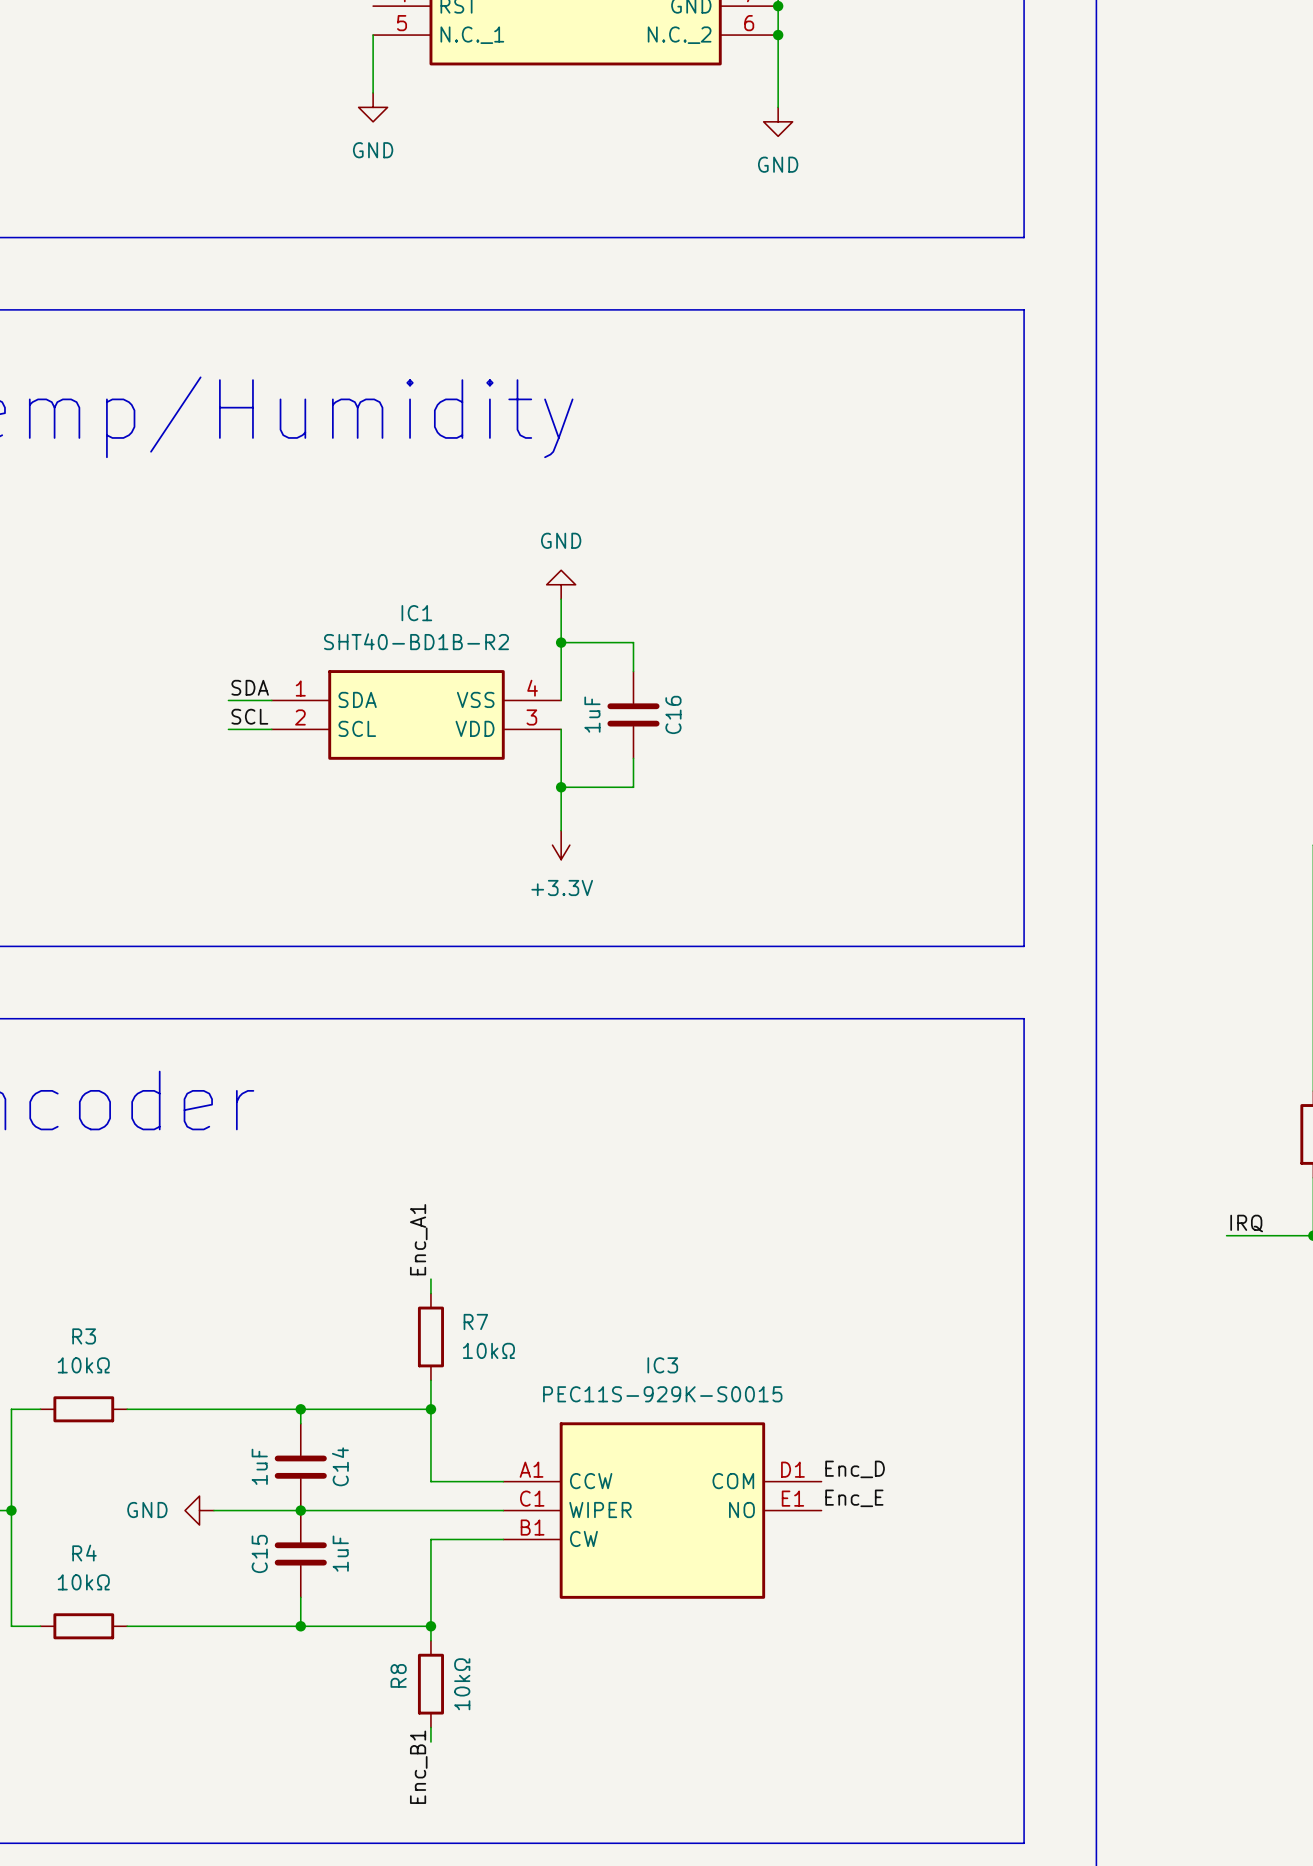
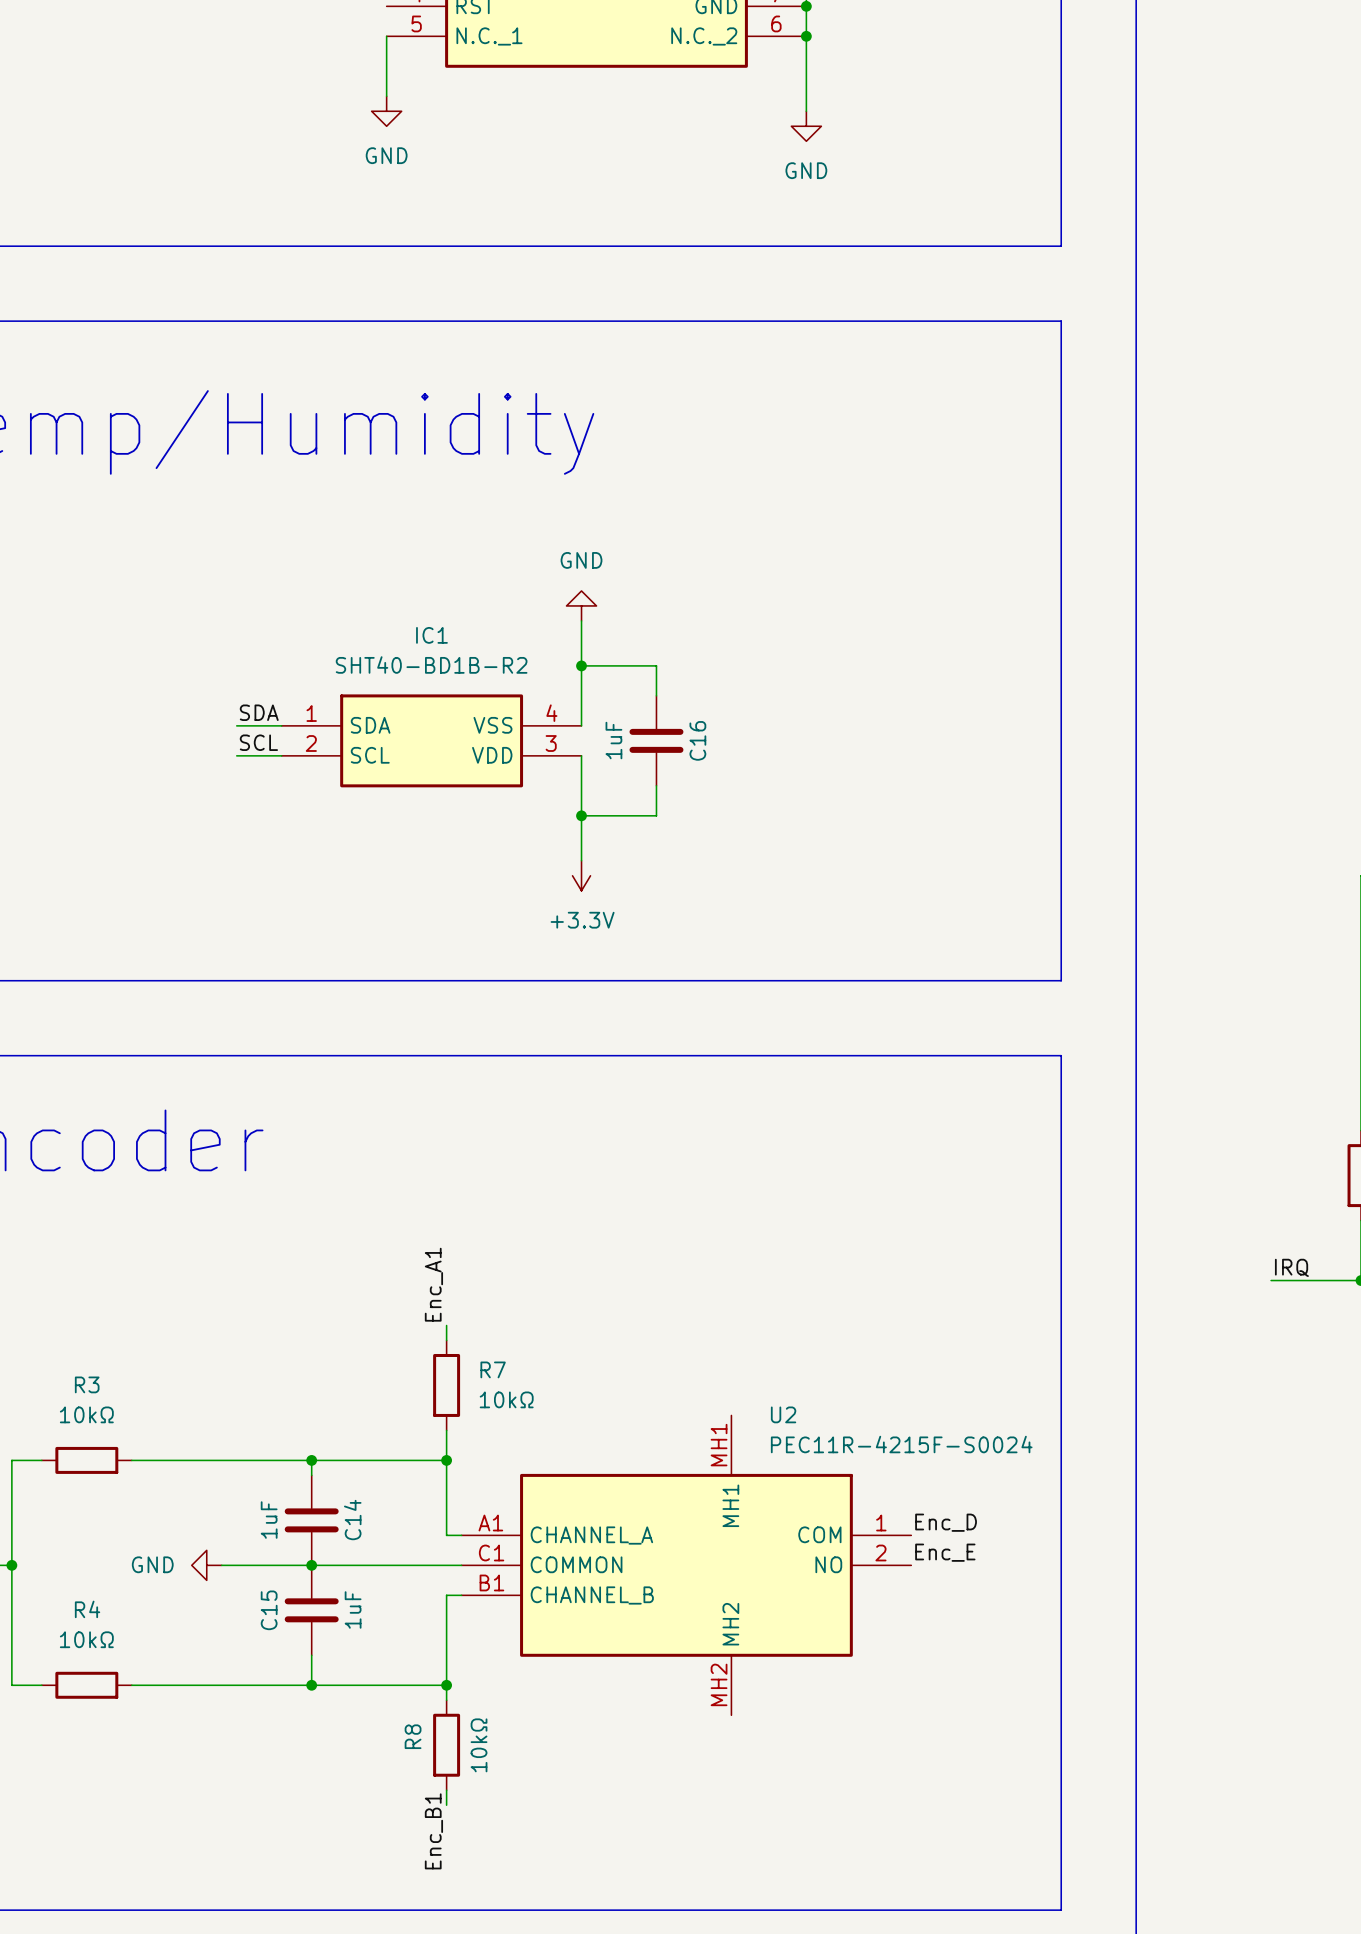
label position: Enc_D (855, 1469) -> Enc_D (946, 1522)
label position: Enc_E (854, 1498) -> Enc_E (945, 1552)
IC3: PEC11S-929K-S0015 (662, 1510) -> none
U2: none -> PEC11R-4215F-S0024 (686, 1565)

